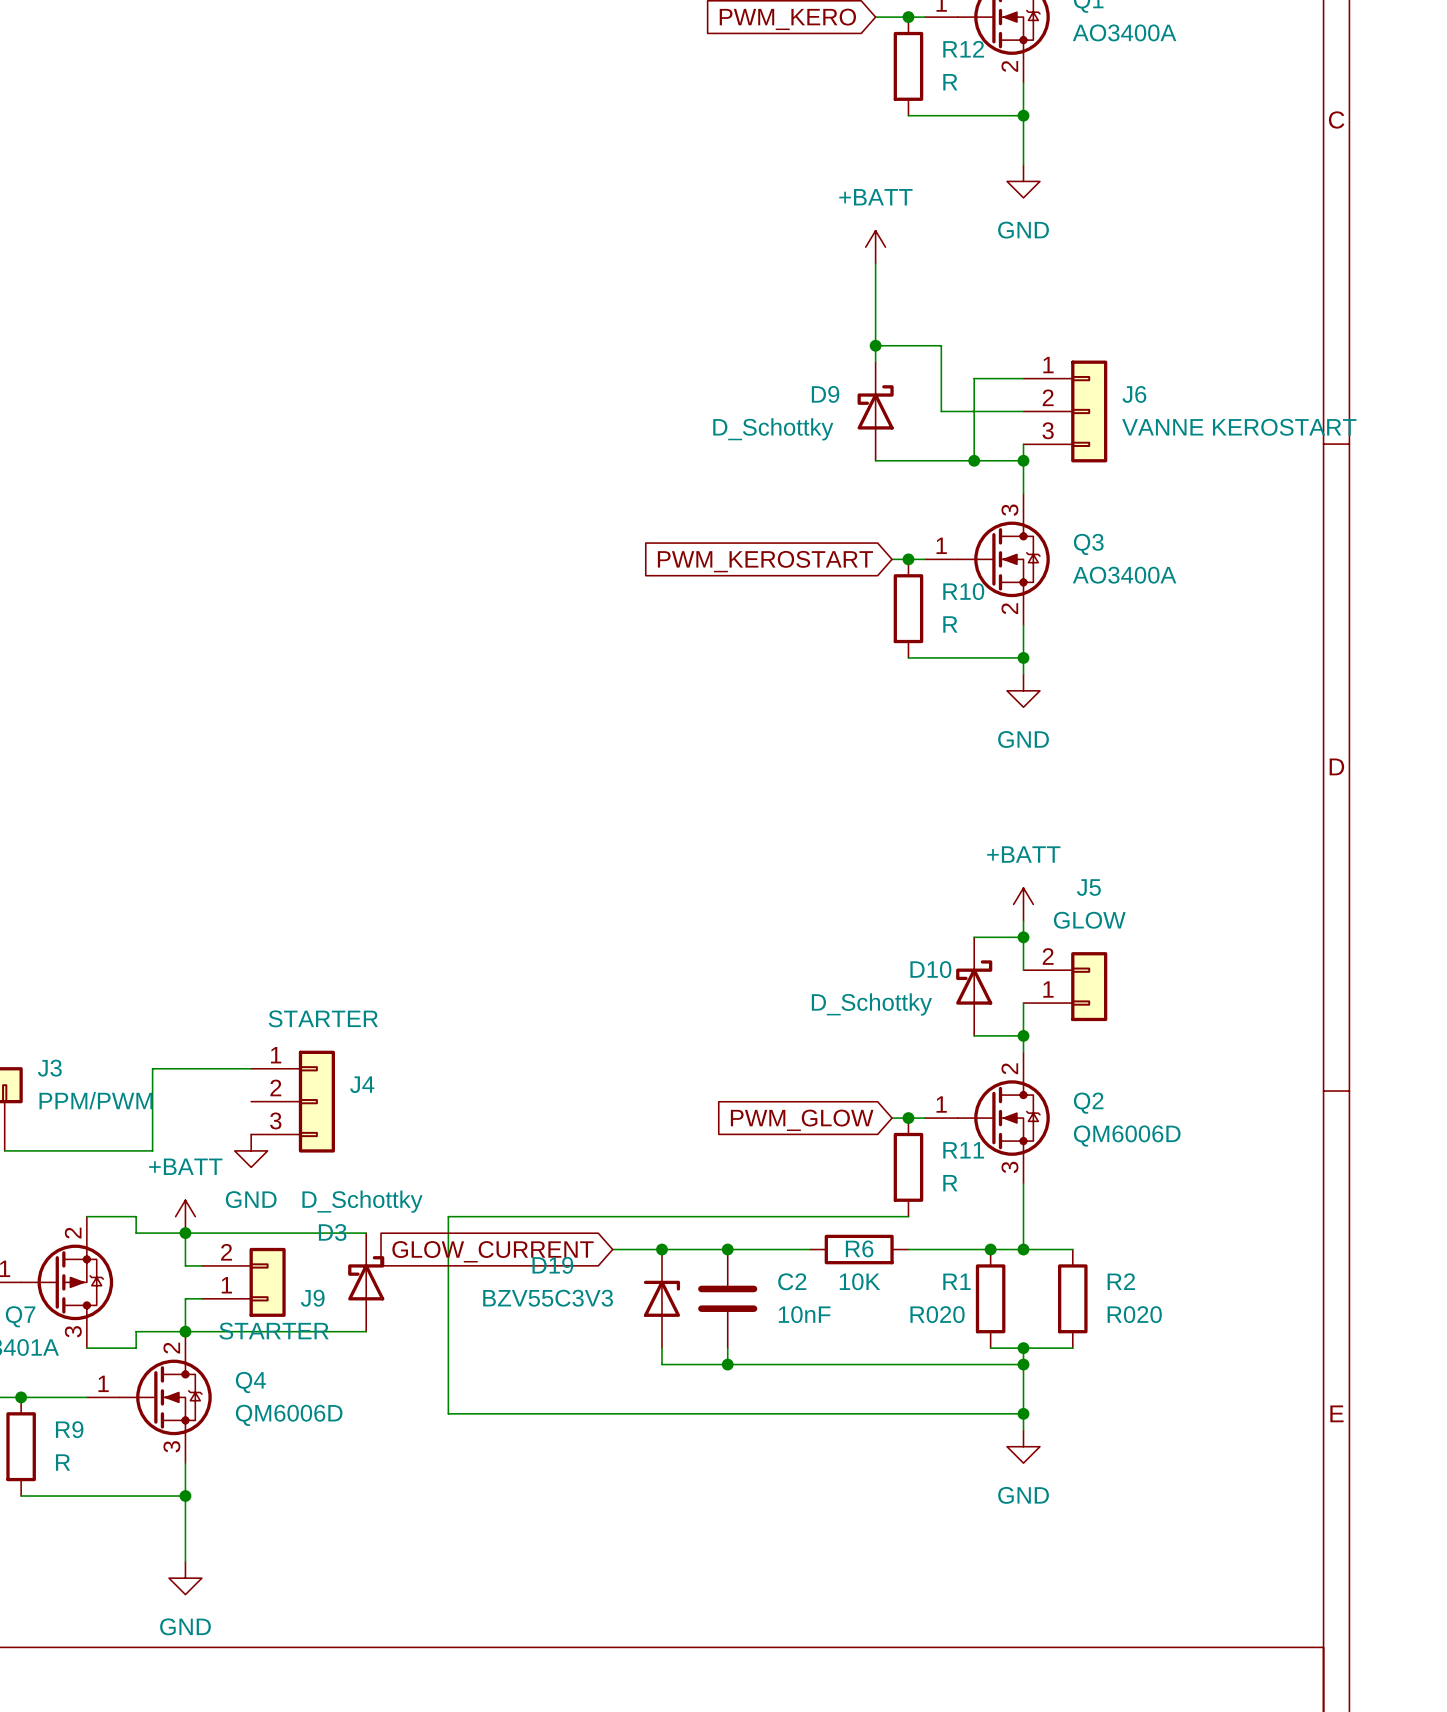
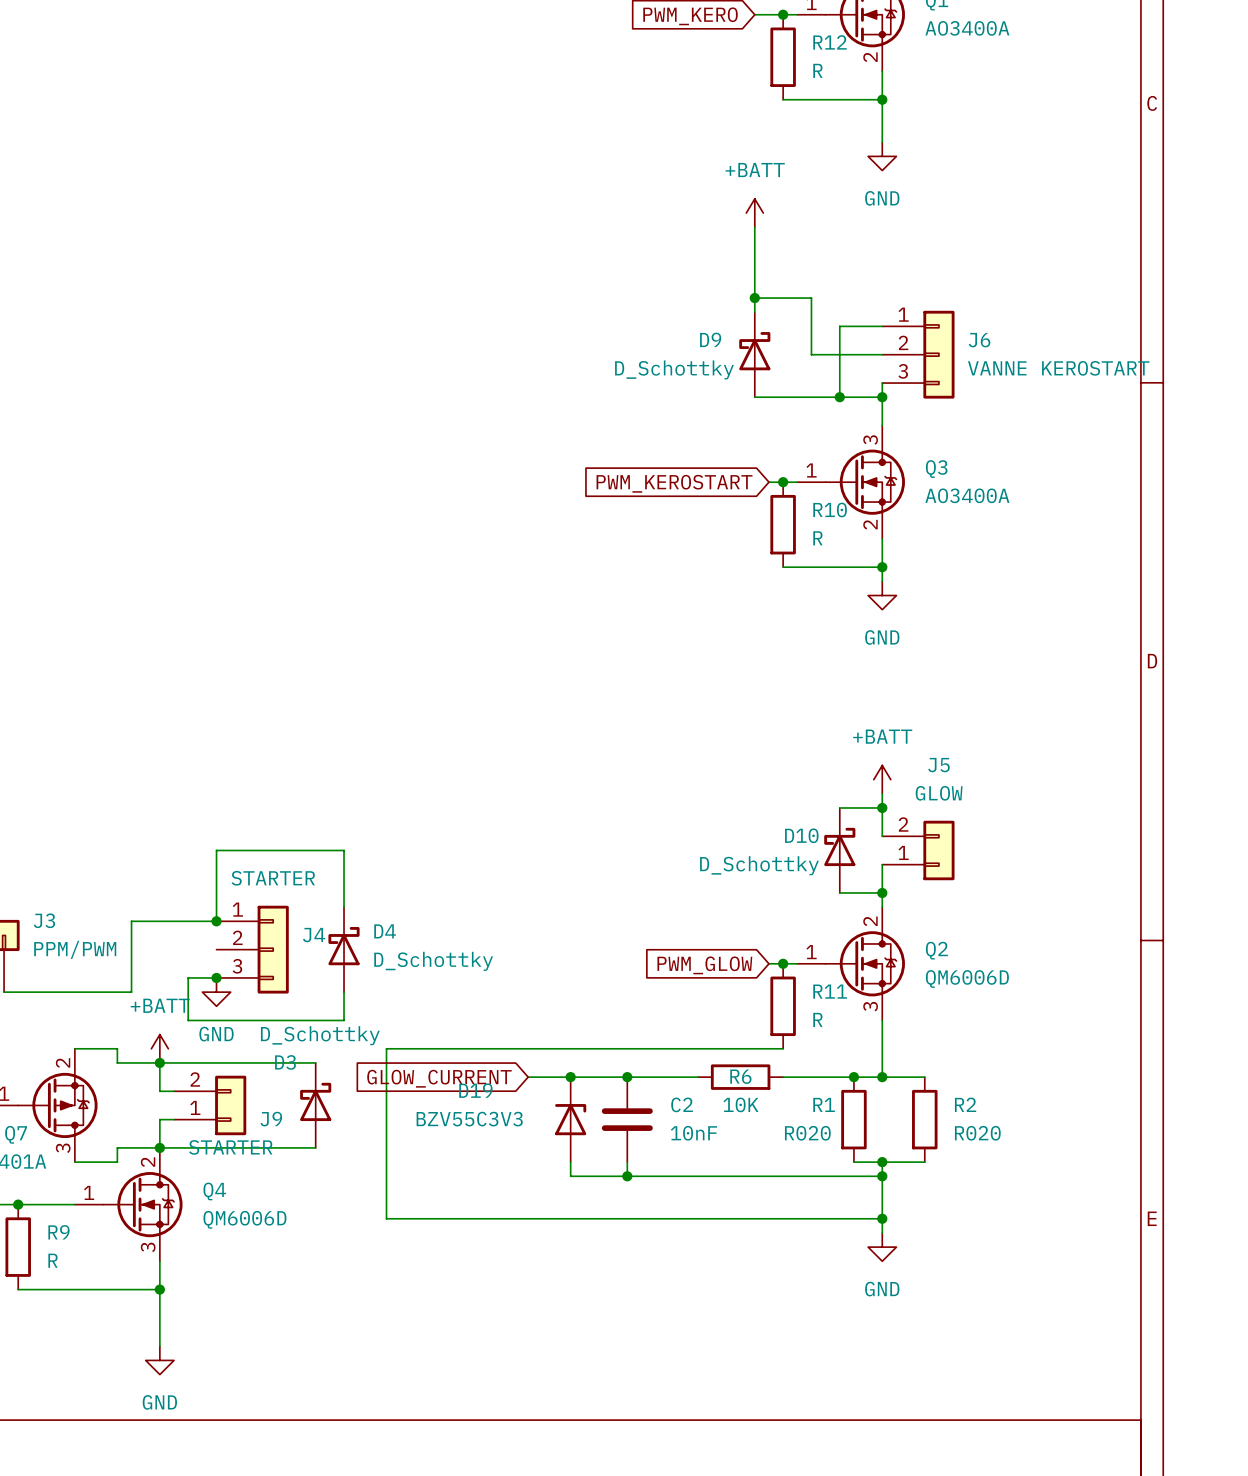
wire: none -> (344, 907) (344, 850) (216, 850) (216, 921)
junction: none -> (216, 921)
D4: none -> D_Schottky (344, 949)
wire: none -> (216, 977) (188, 977) (188, 1020) (344, 1020) (344, 992)
junction: none -> (216, 977)

